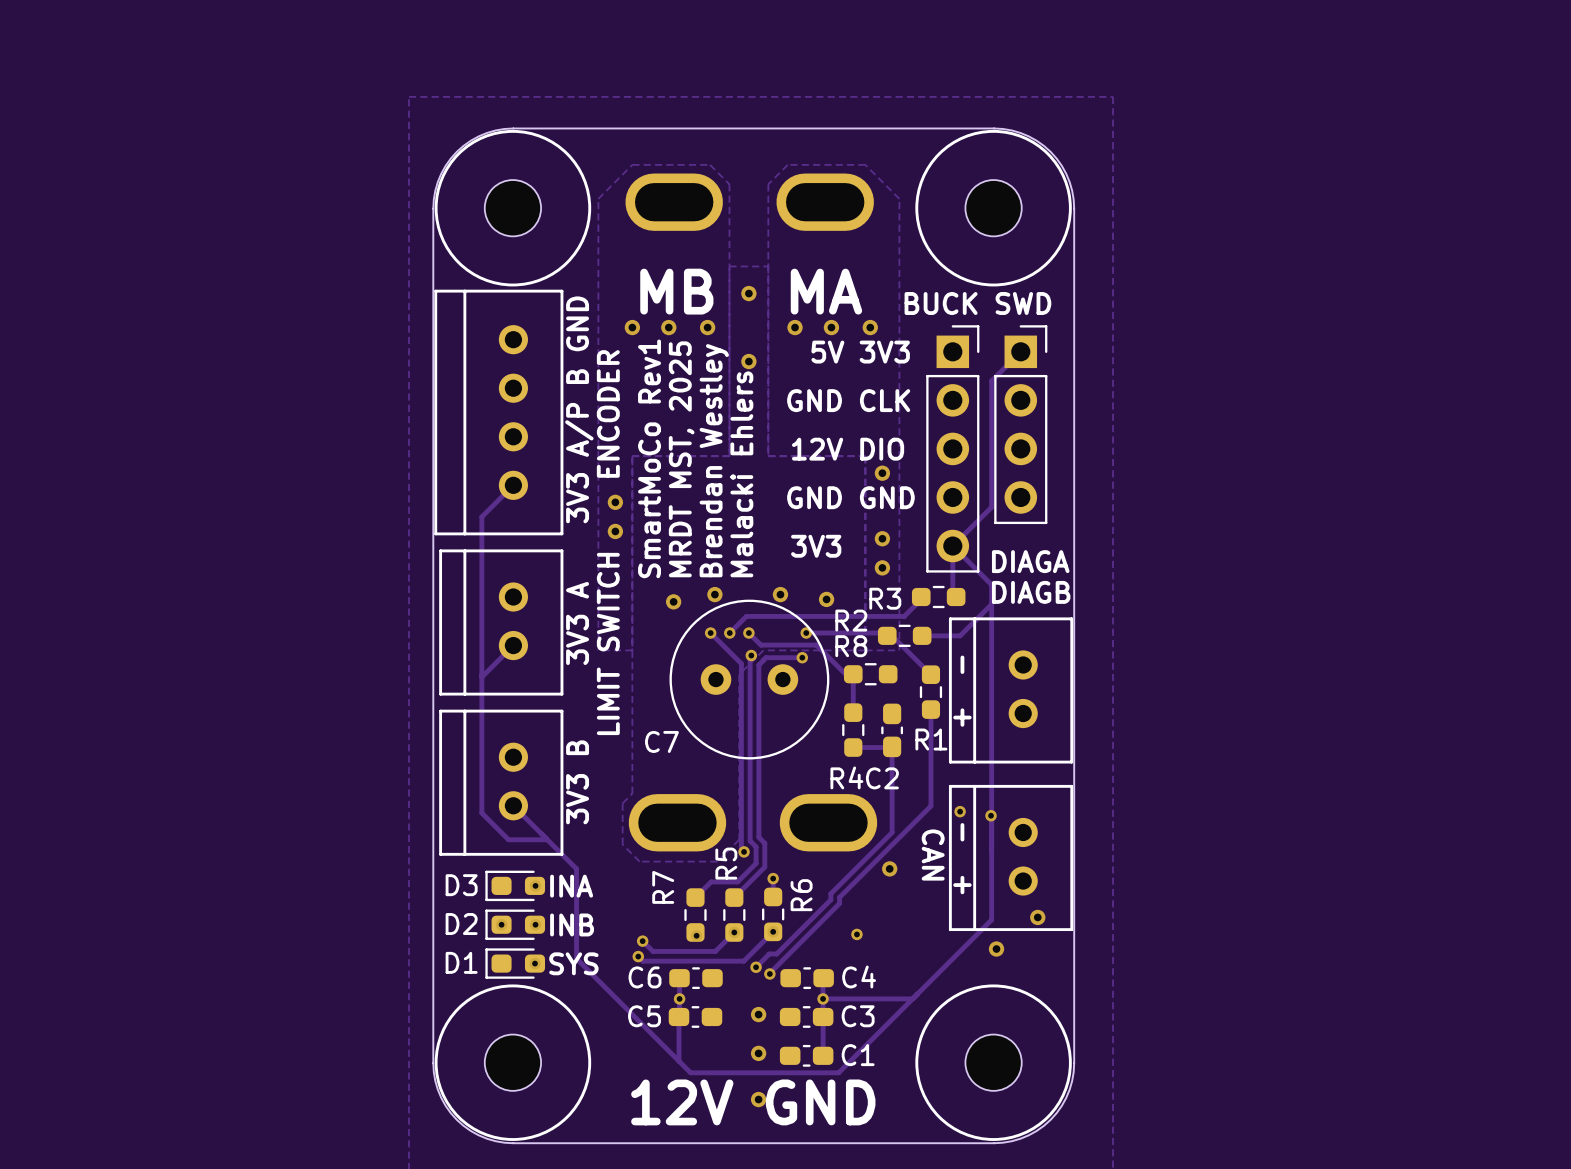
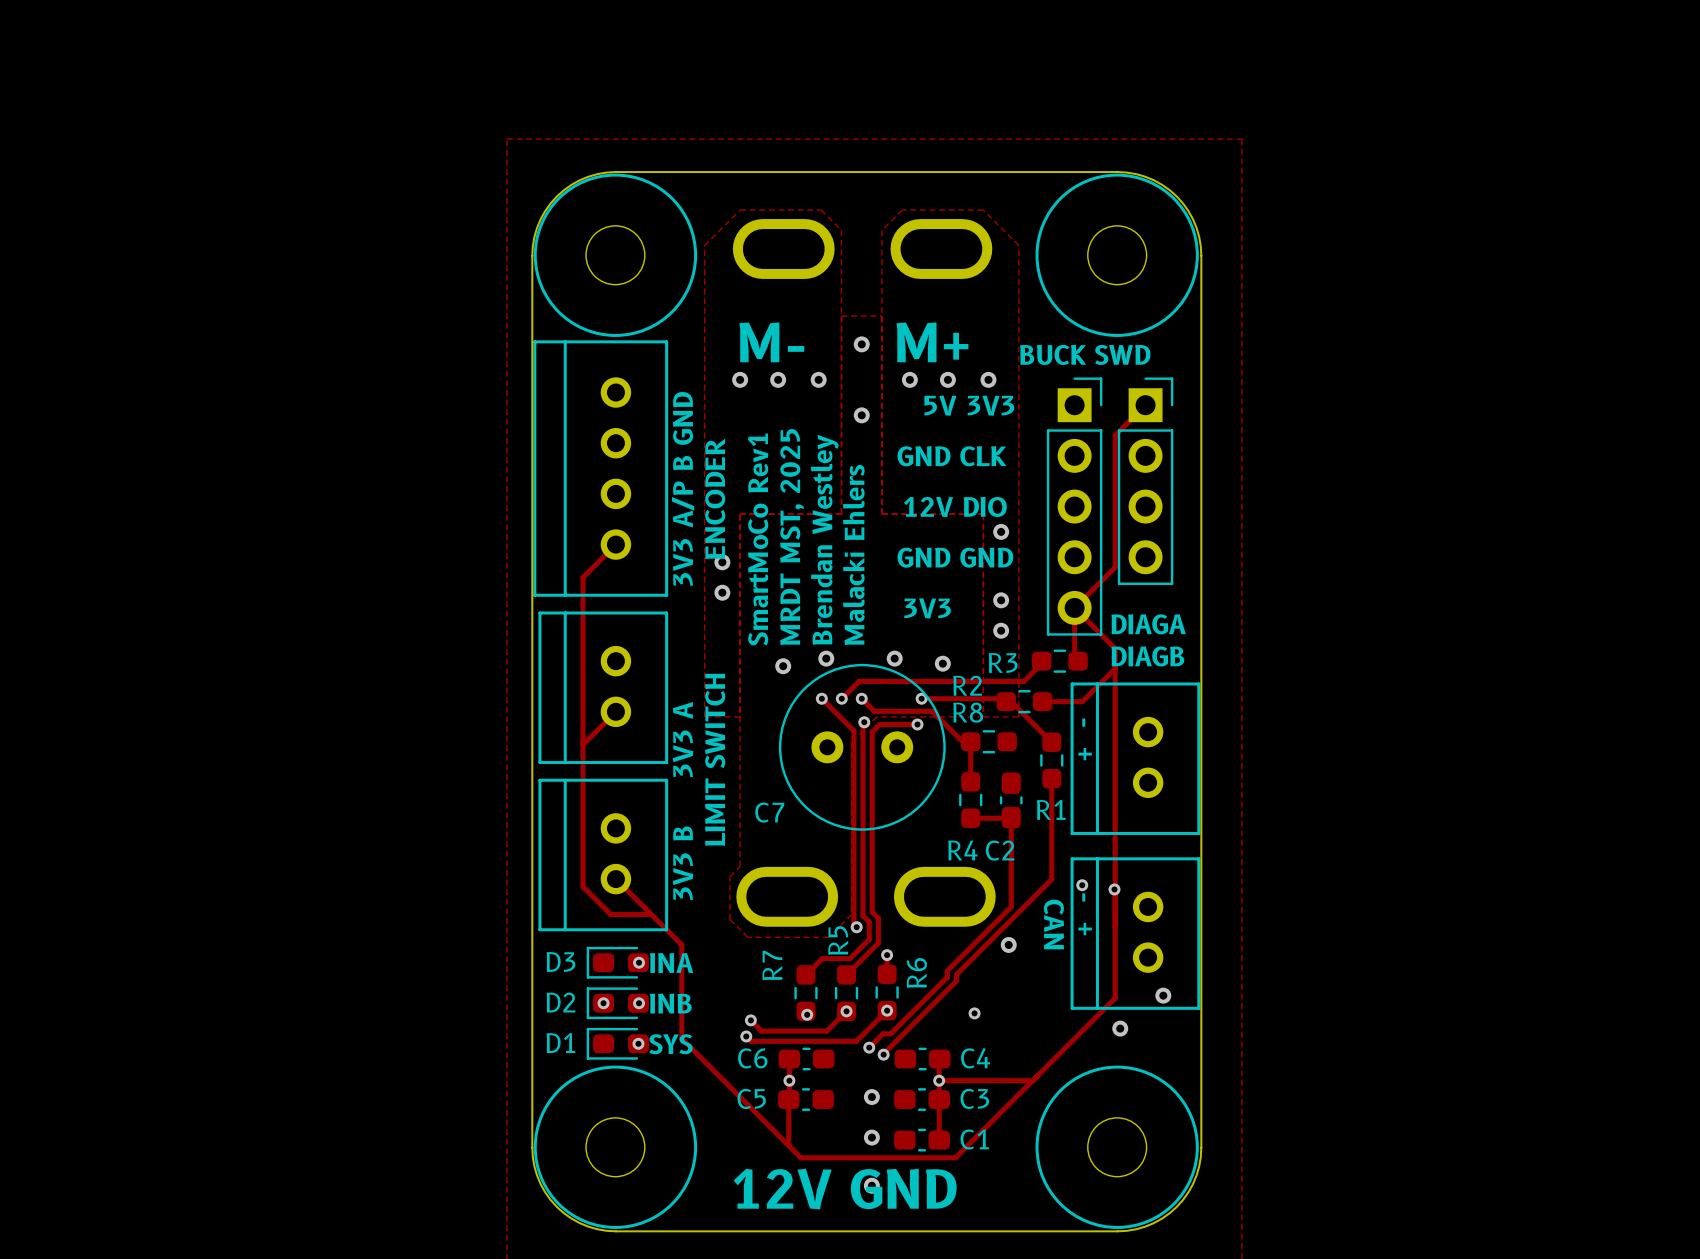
text: MB (676, 291) -> M- (771, 342)
text: MA (826, 291) -> M+ (932, 342)

